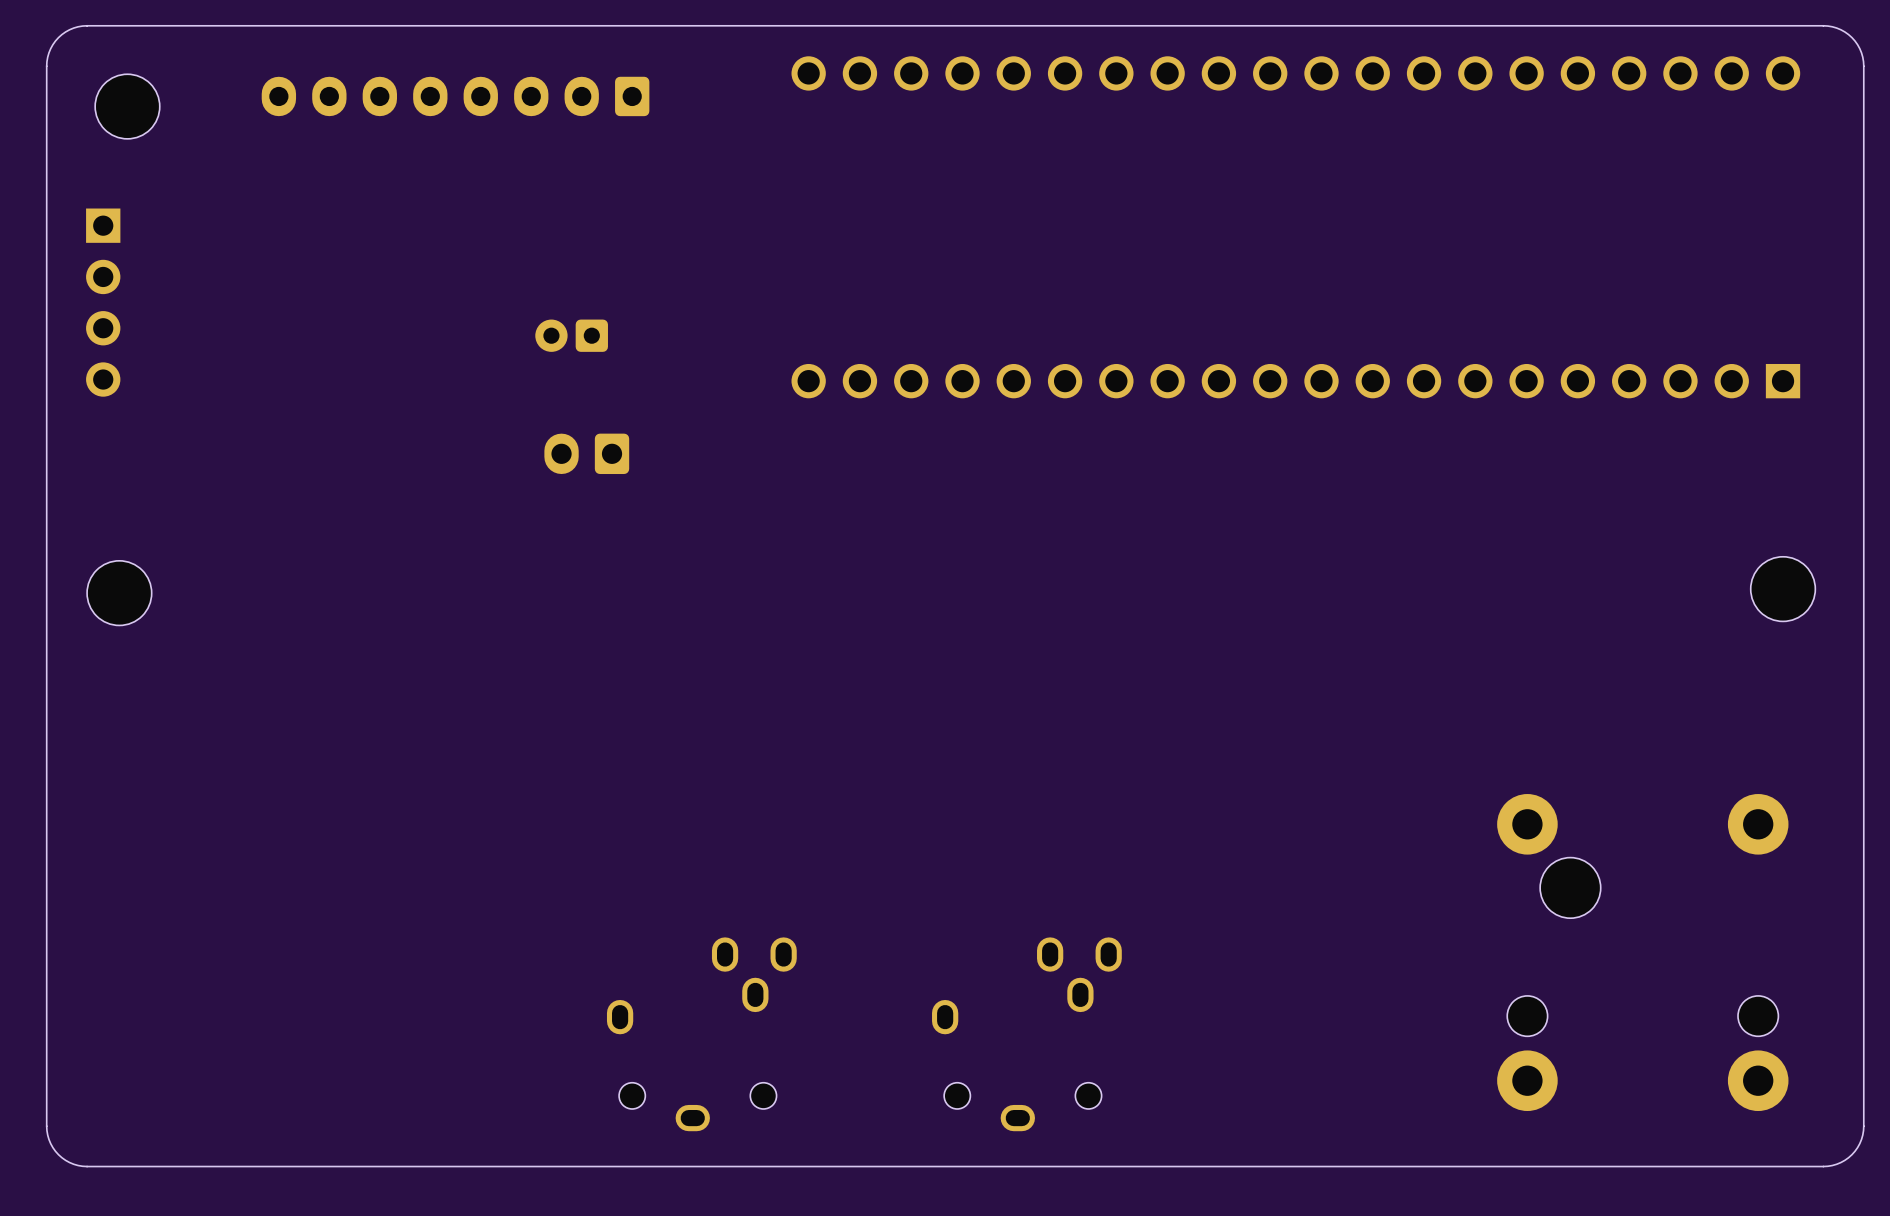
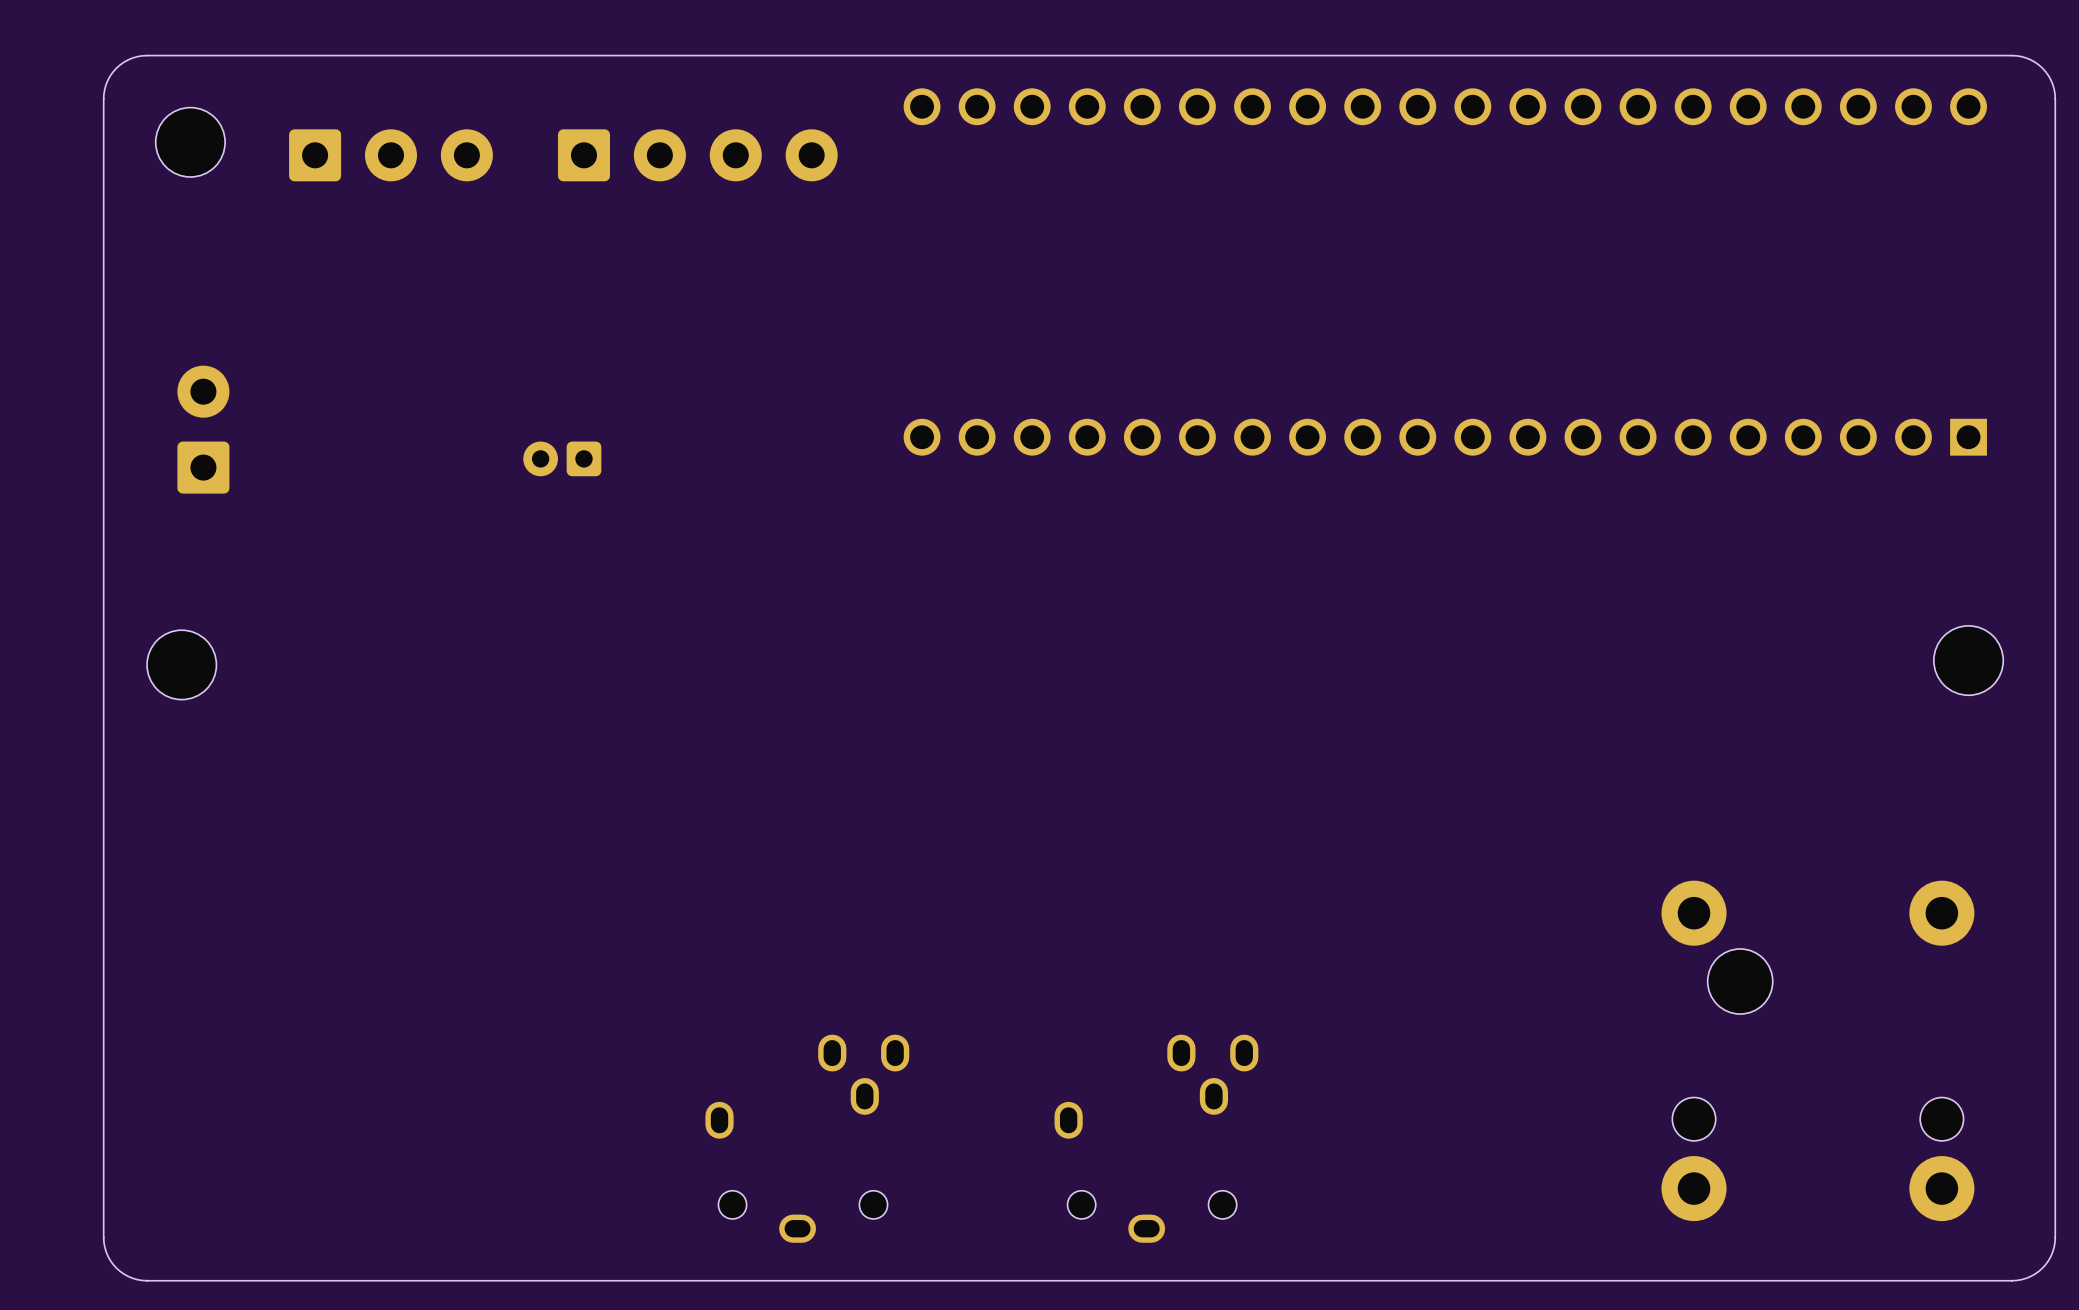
part: (455, 96) -> none
part: none -> (391, 155)
part: none -> (697, 155)
part: (103, 302) -> none
part position: (571, 335) -> (562, 458)
part: none -> (203, 429)
part: (586, 453) -> none

